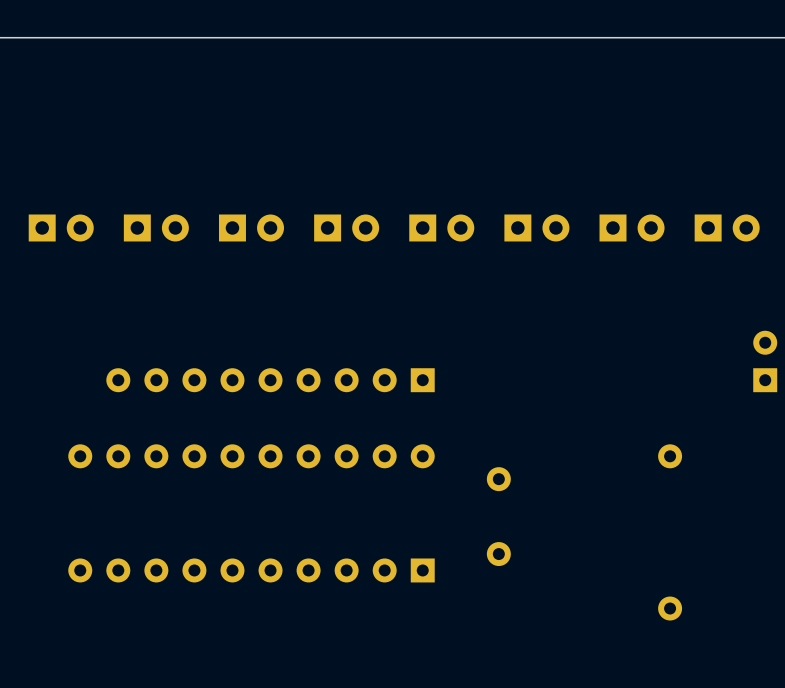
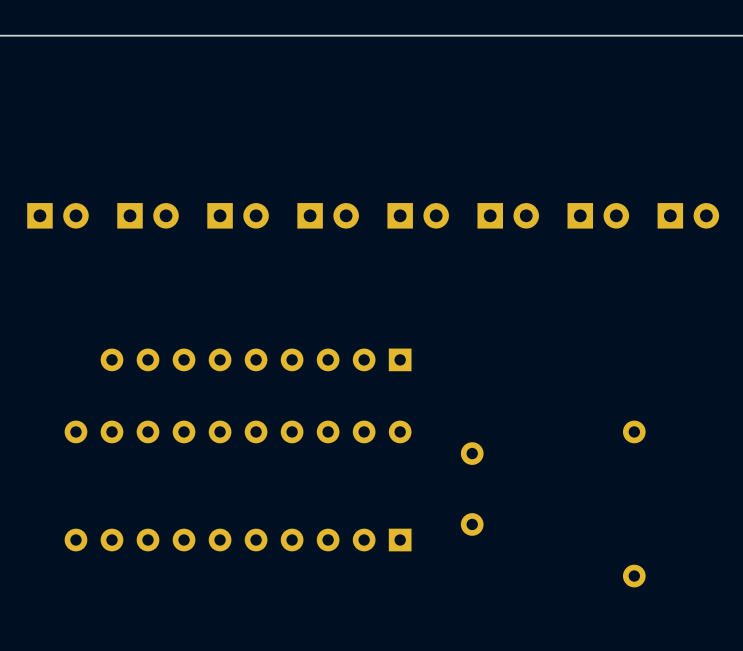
part: (765, 361) -> none

